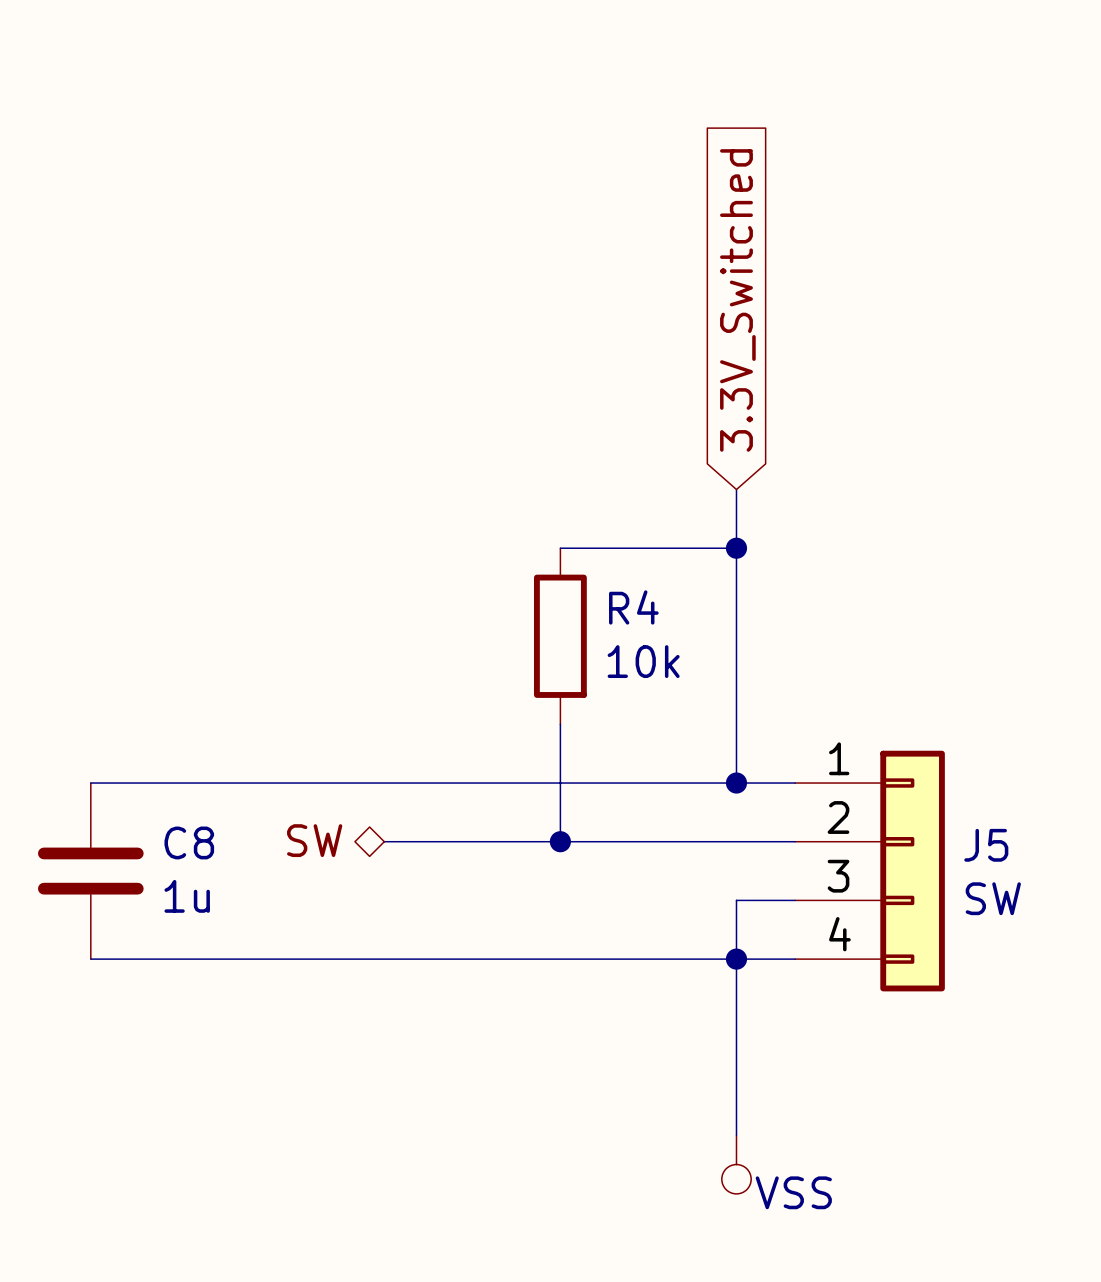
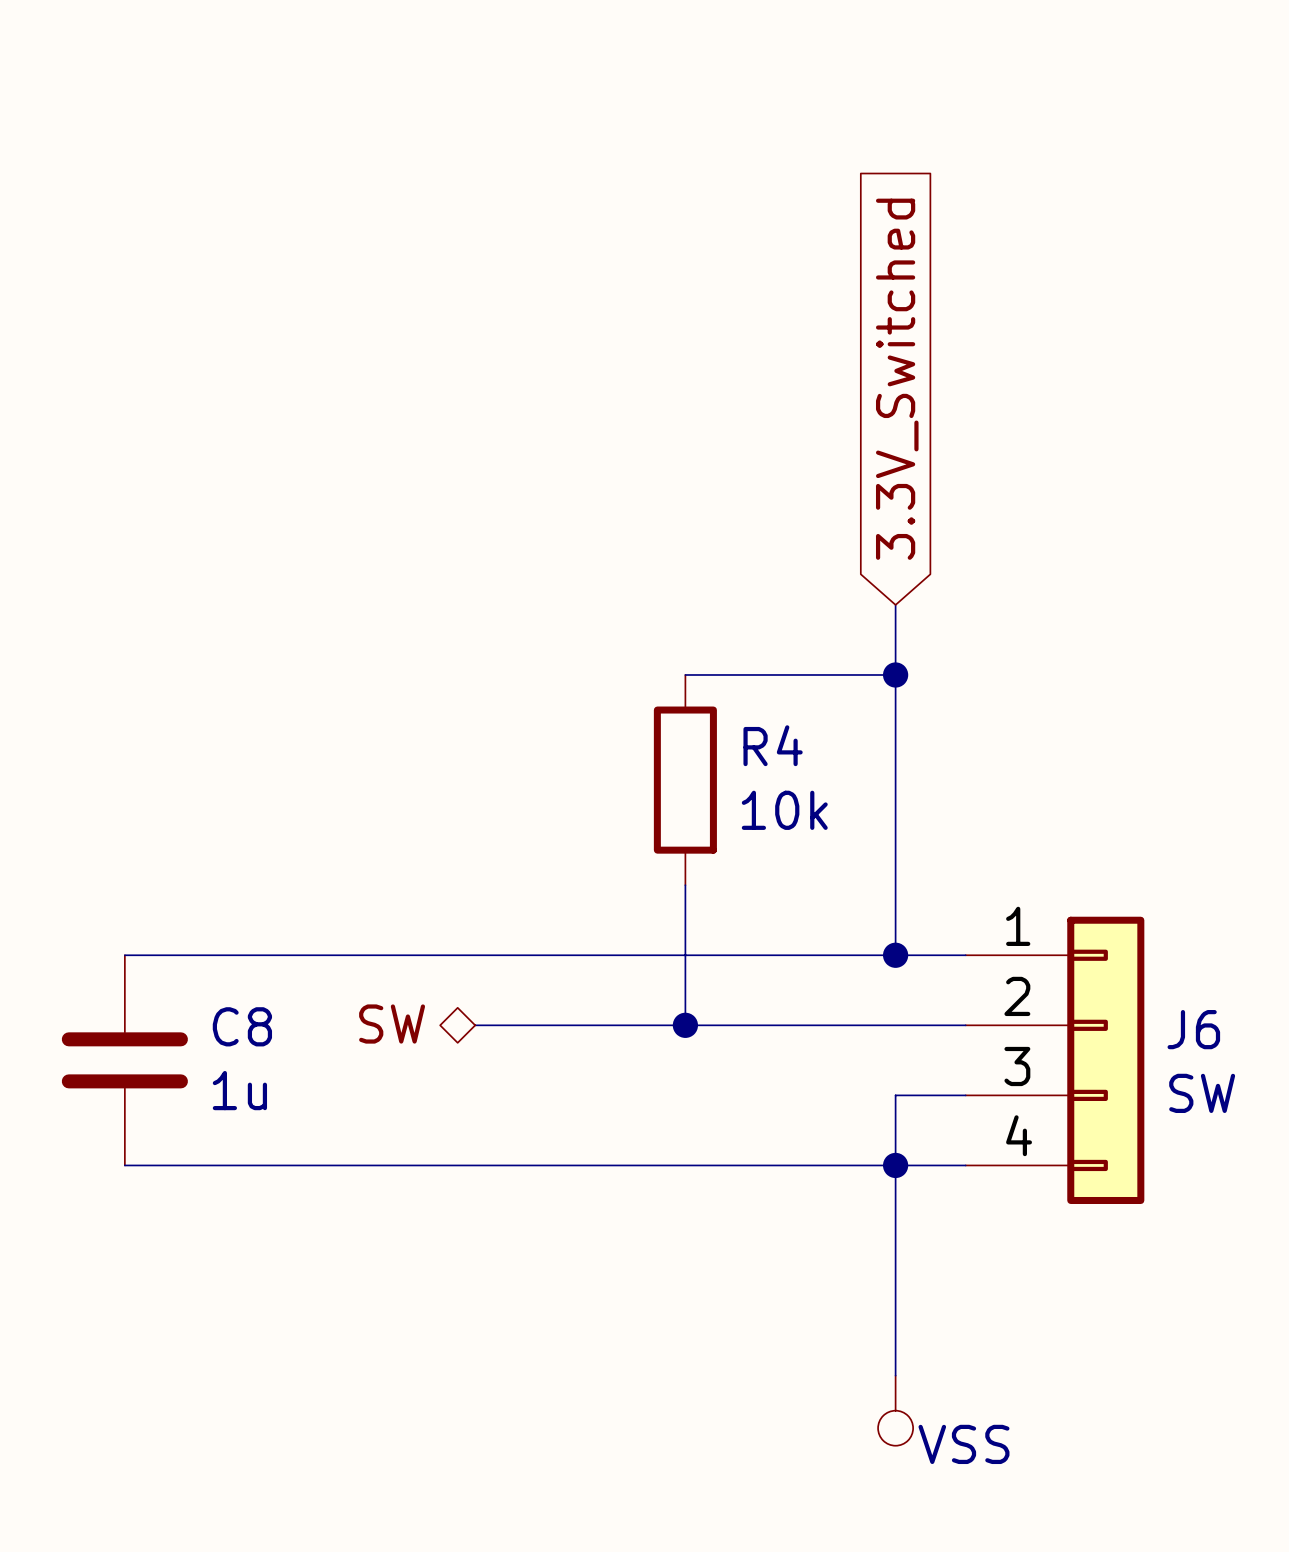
J5 name: J5 (986, 845) -> J6 (1193, 1029)

